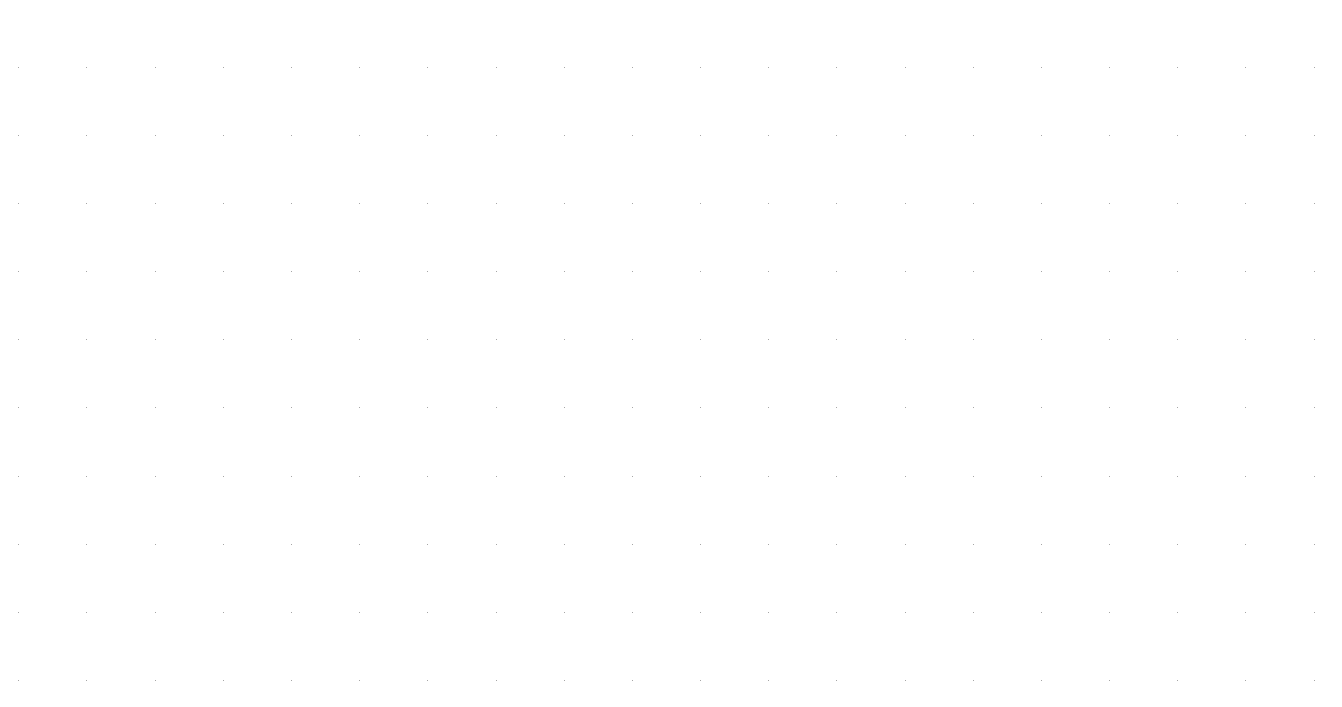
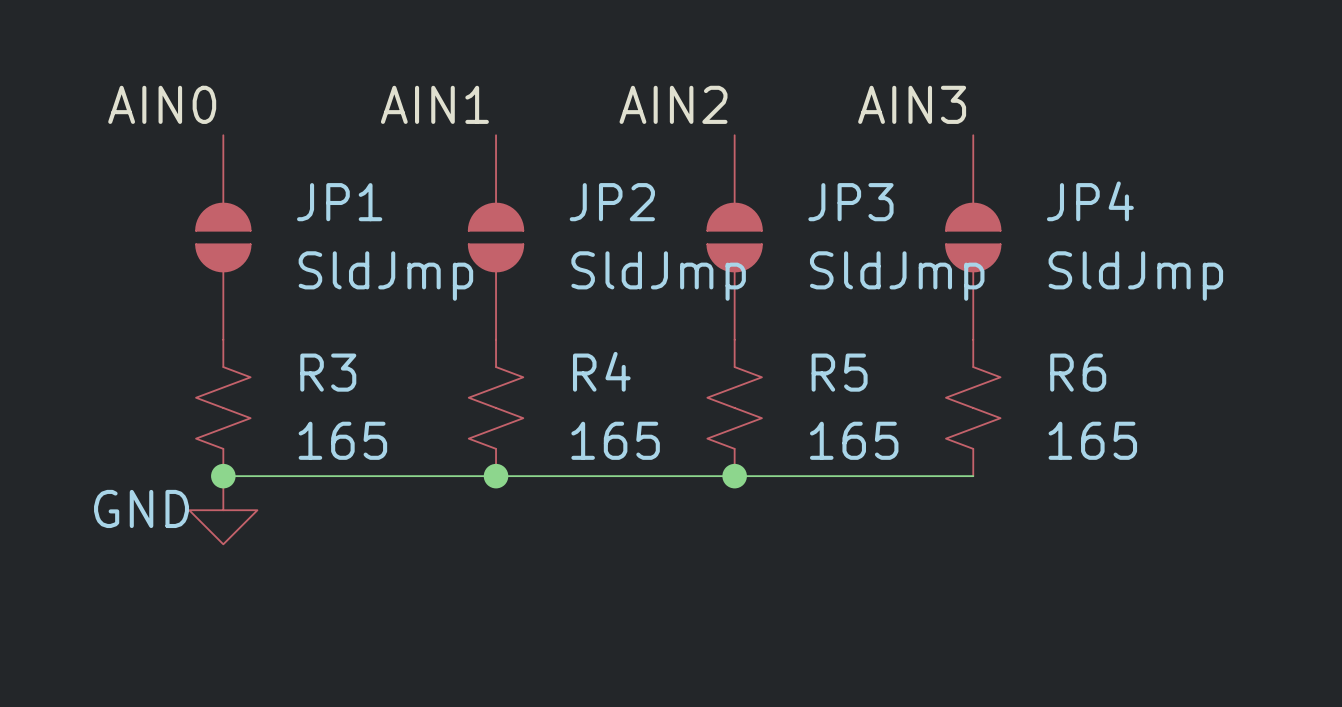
label: none -> AIN0 (162, 104)
label: none -> AIN1 (434, 104)
label: none -> AIN2 (673, 104)
label: none -> AIN3 (912, 104)
JP1: none -> SldJmp (223, 237)
JP2: none -> SldJmp (496, 237)
JP3: none -> SldJmp (734, 237)
JP4: none -> SldJmp (973, 237)
R3: none -> 165 (223, 407)
R4: none -> 165 (496, 407)
R5: none -> 165 (734, 407)
R6: none -> 165 (973, 407)
wire: none -> (223, 476) (973, 476)
junction: none -> (223, 476)
junction: none -> (496, 476)
junction: none -> (734, 476)
power symbol: none -> GND (223, 510)

